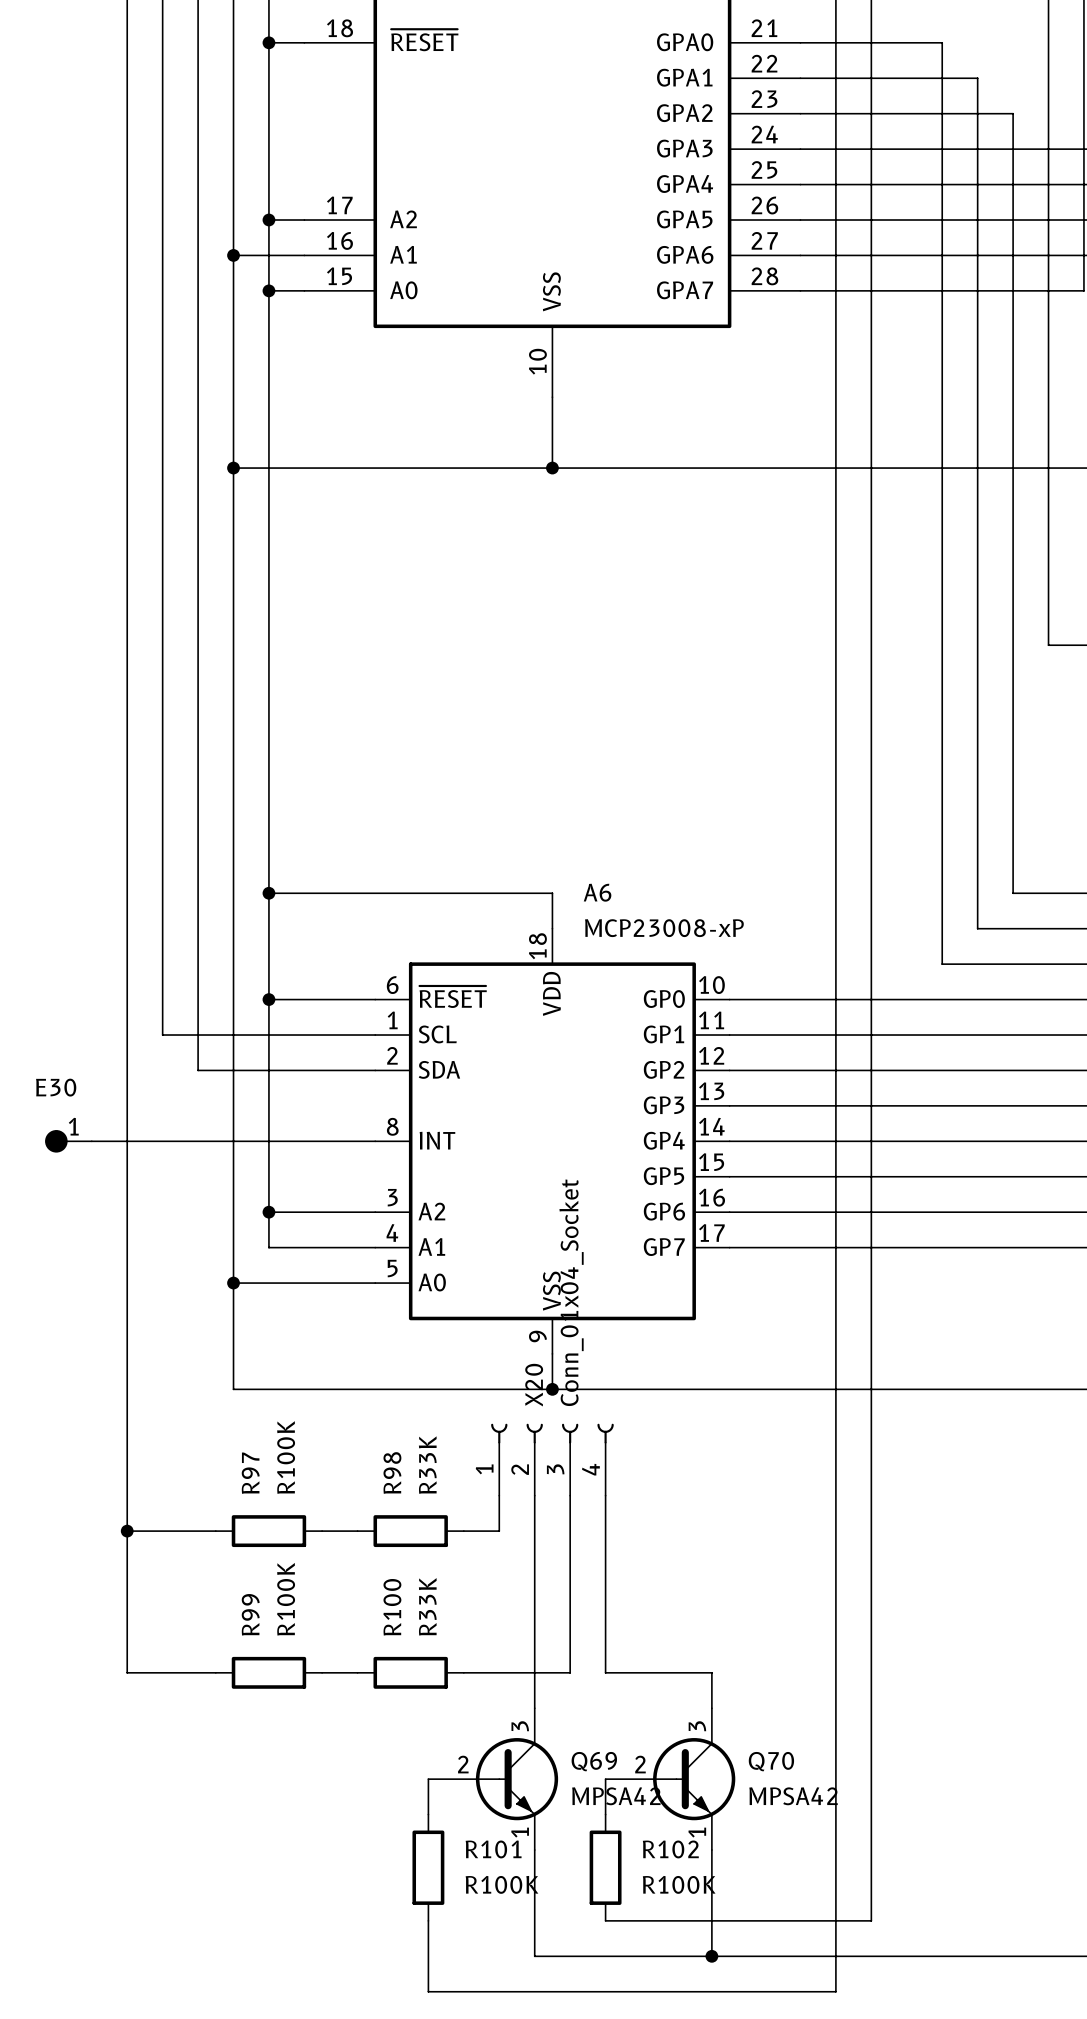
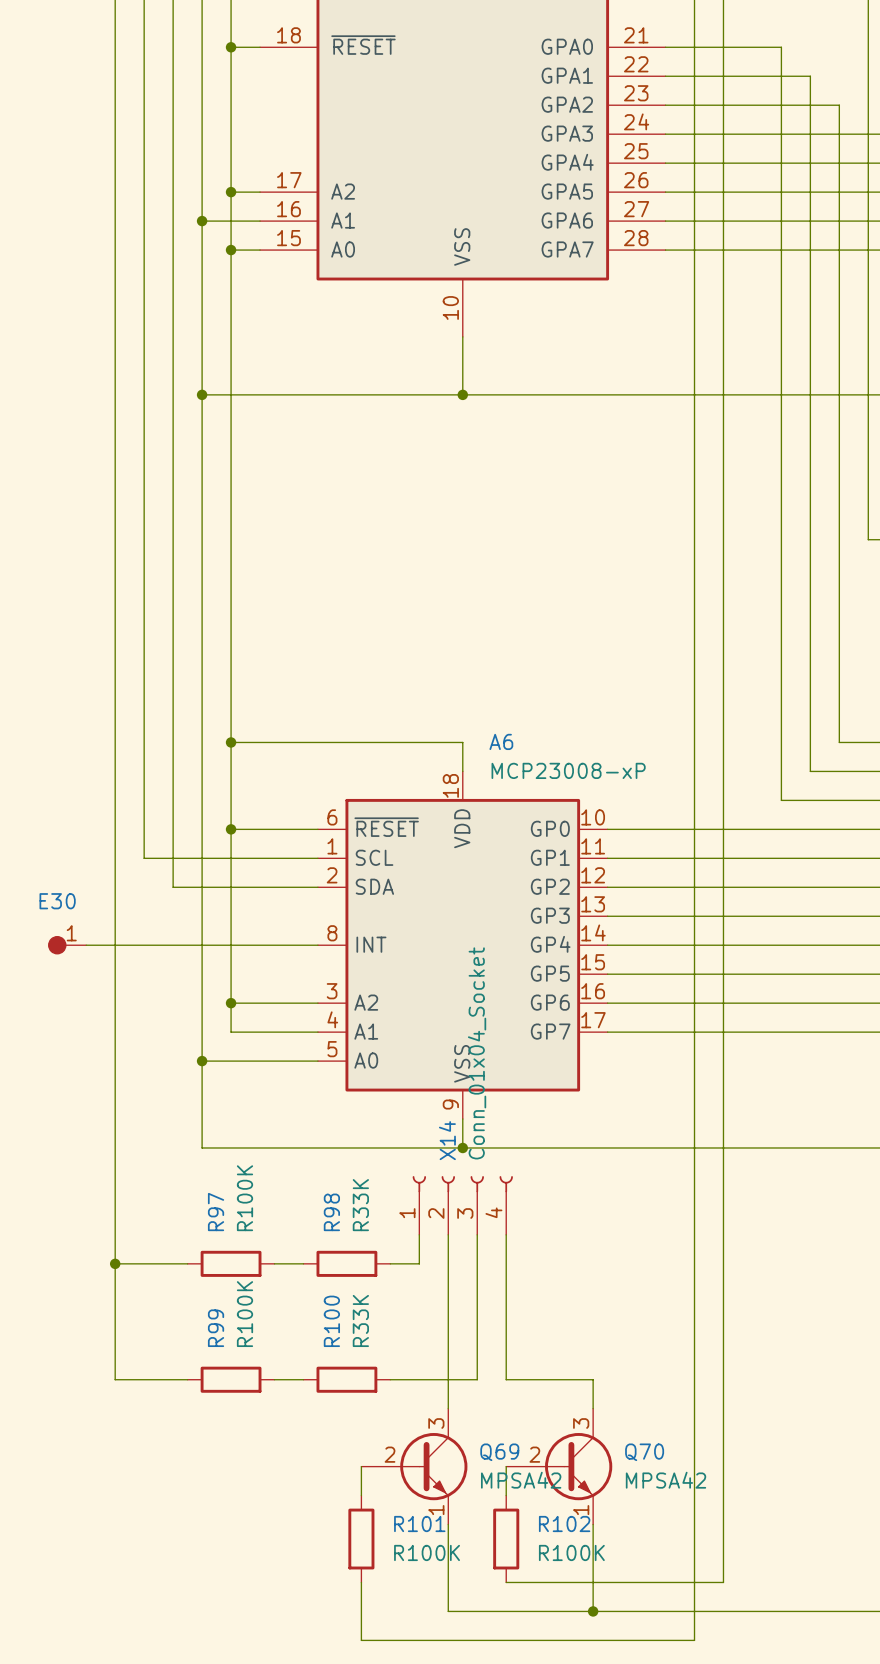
X20 name: X20 (534, 1385) -> X14 (447, 1140)

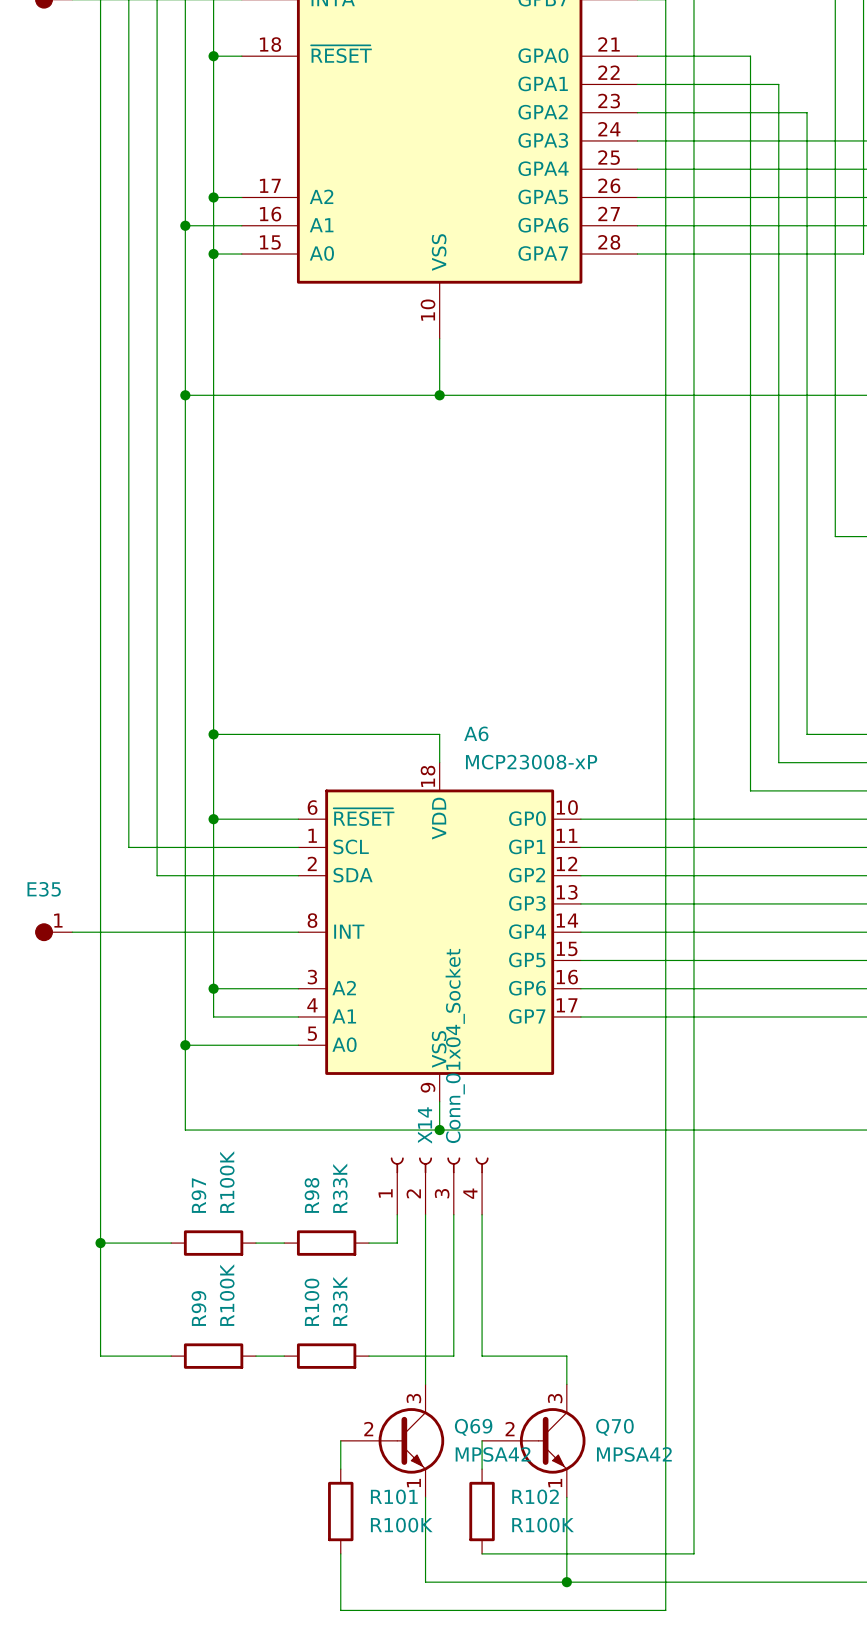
E30 name: E30 (57, 901) -> E35 (44, 889)

